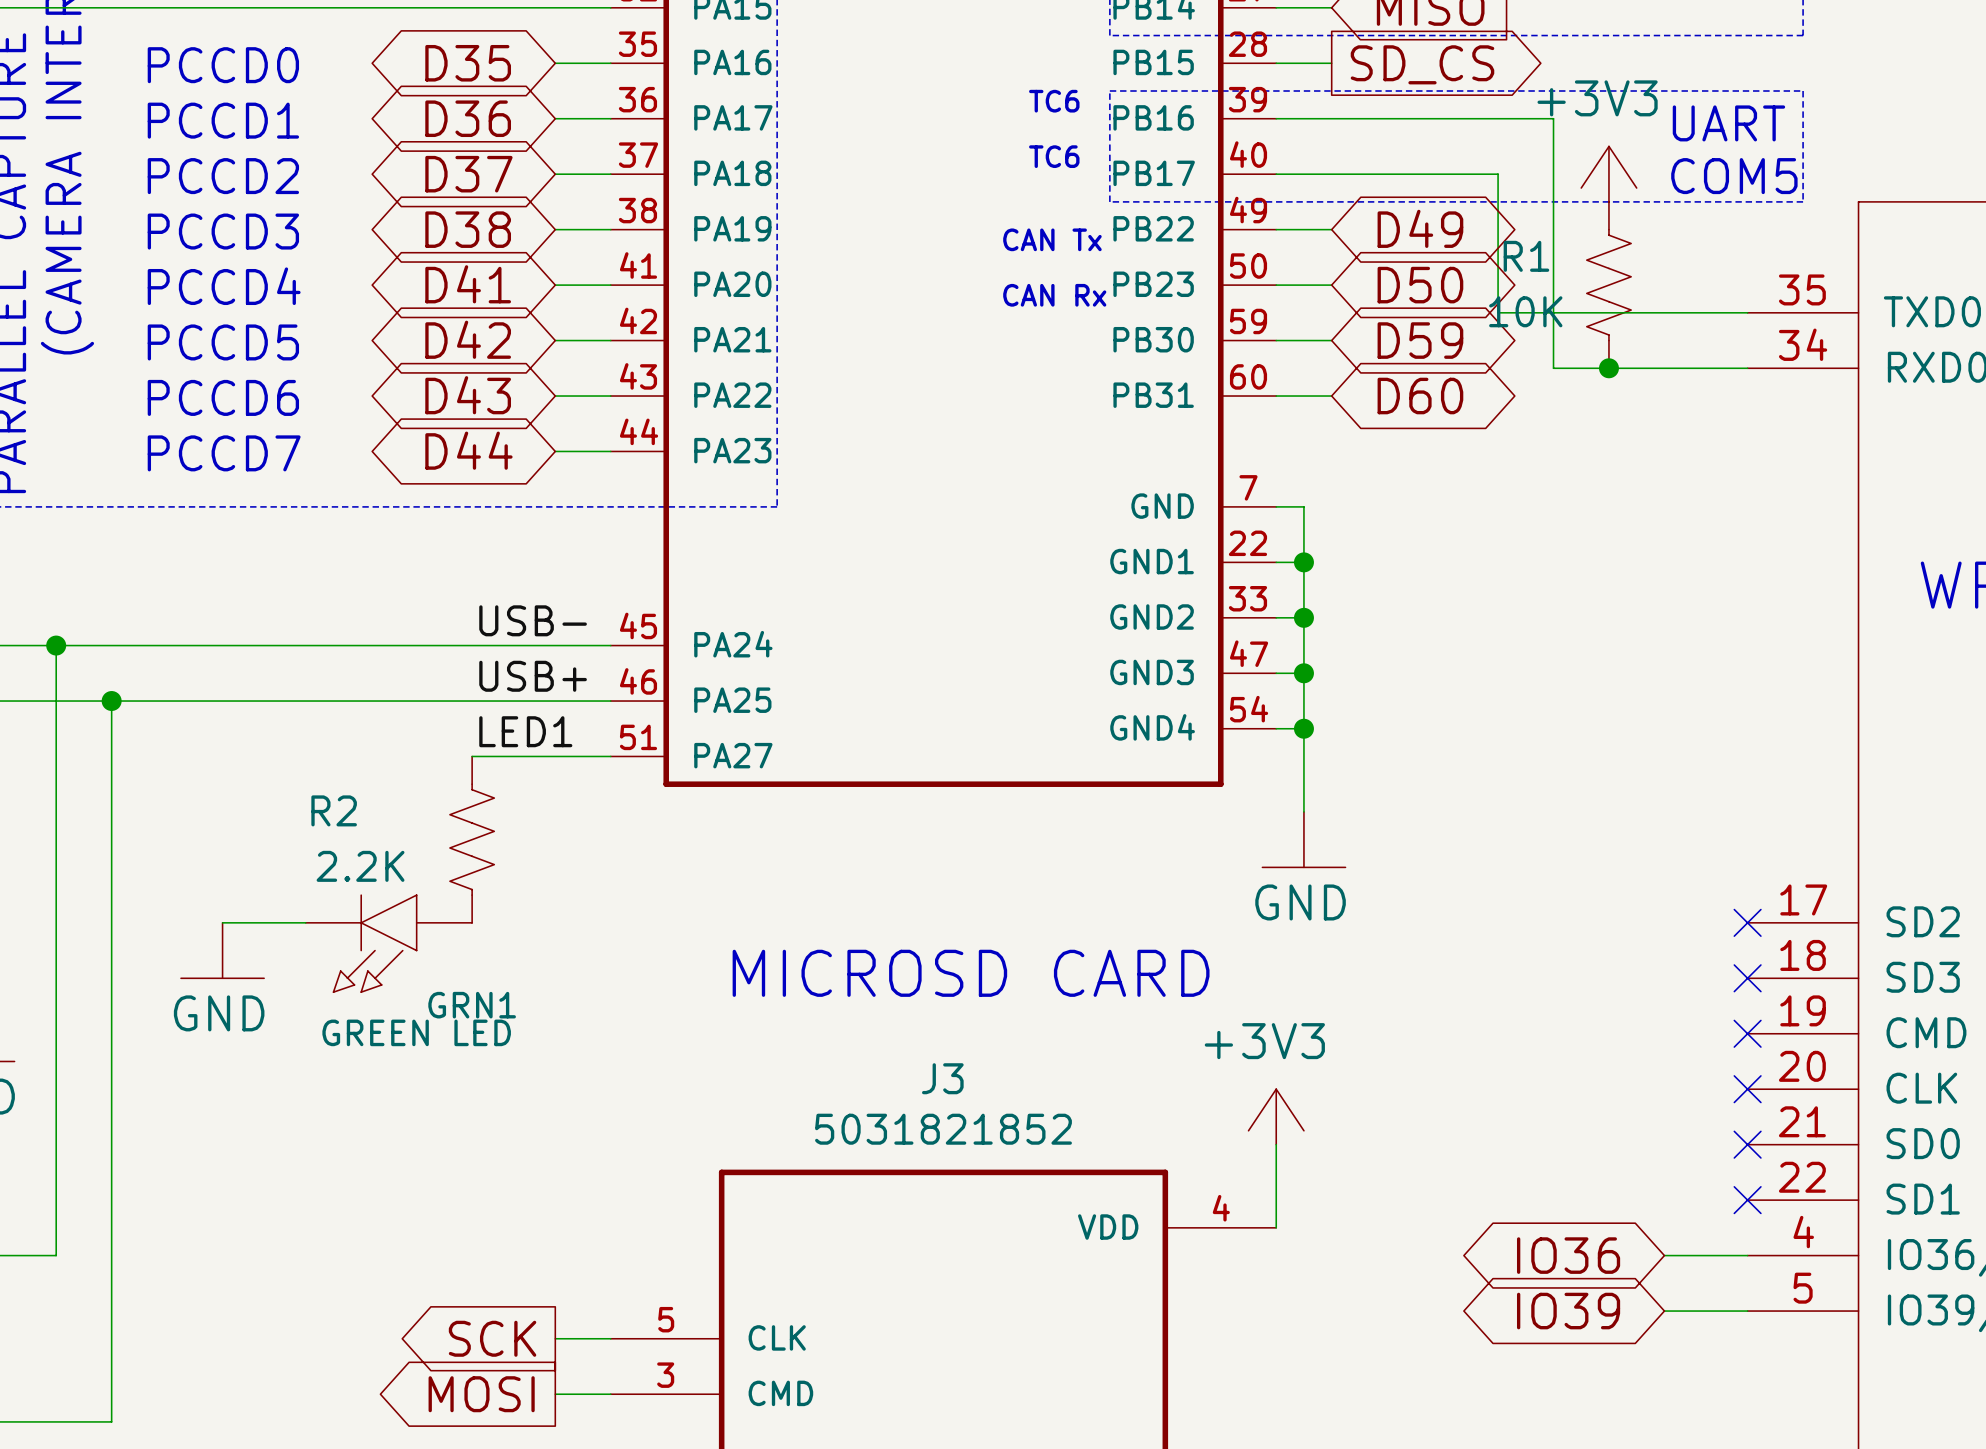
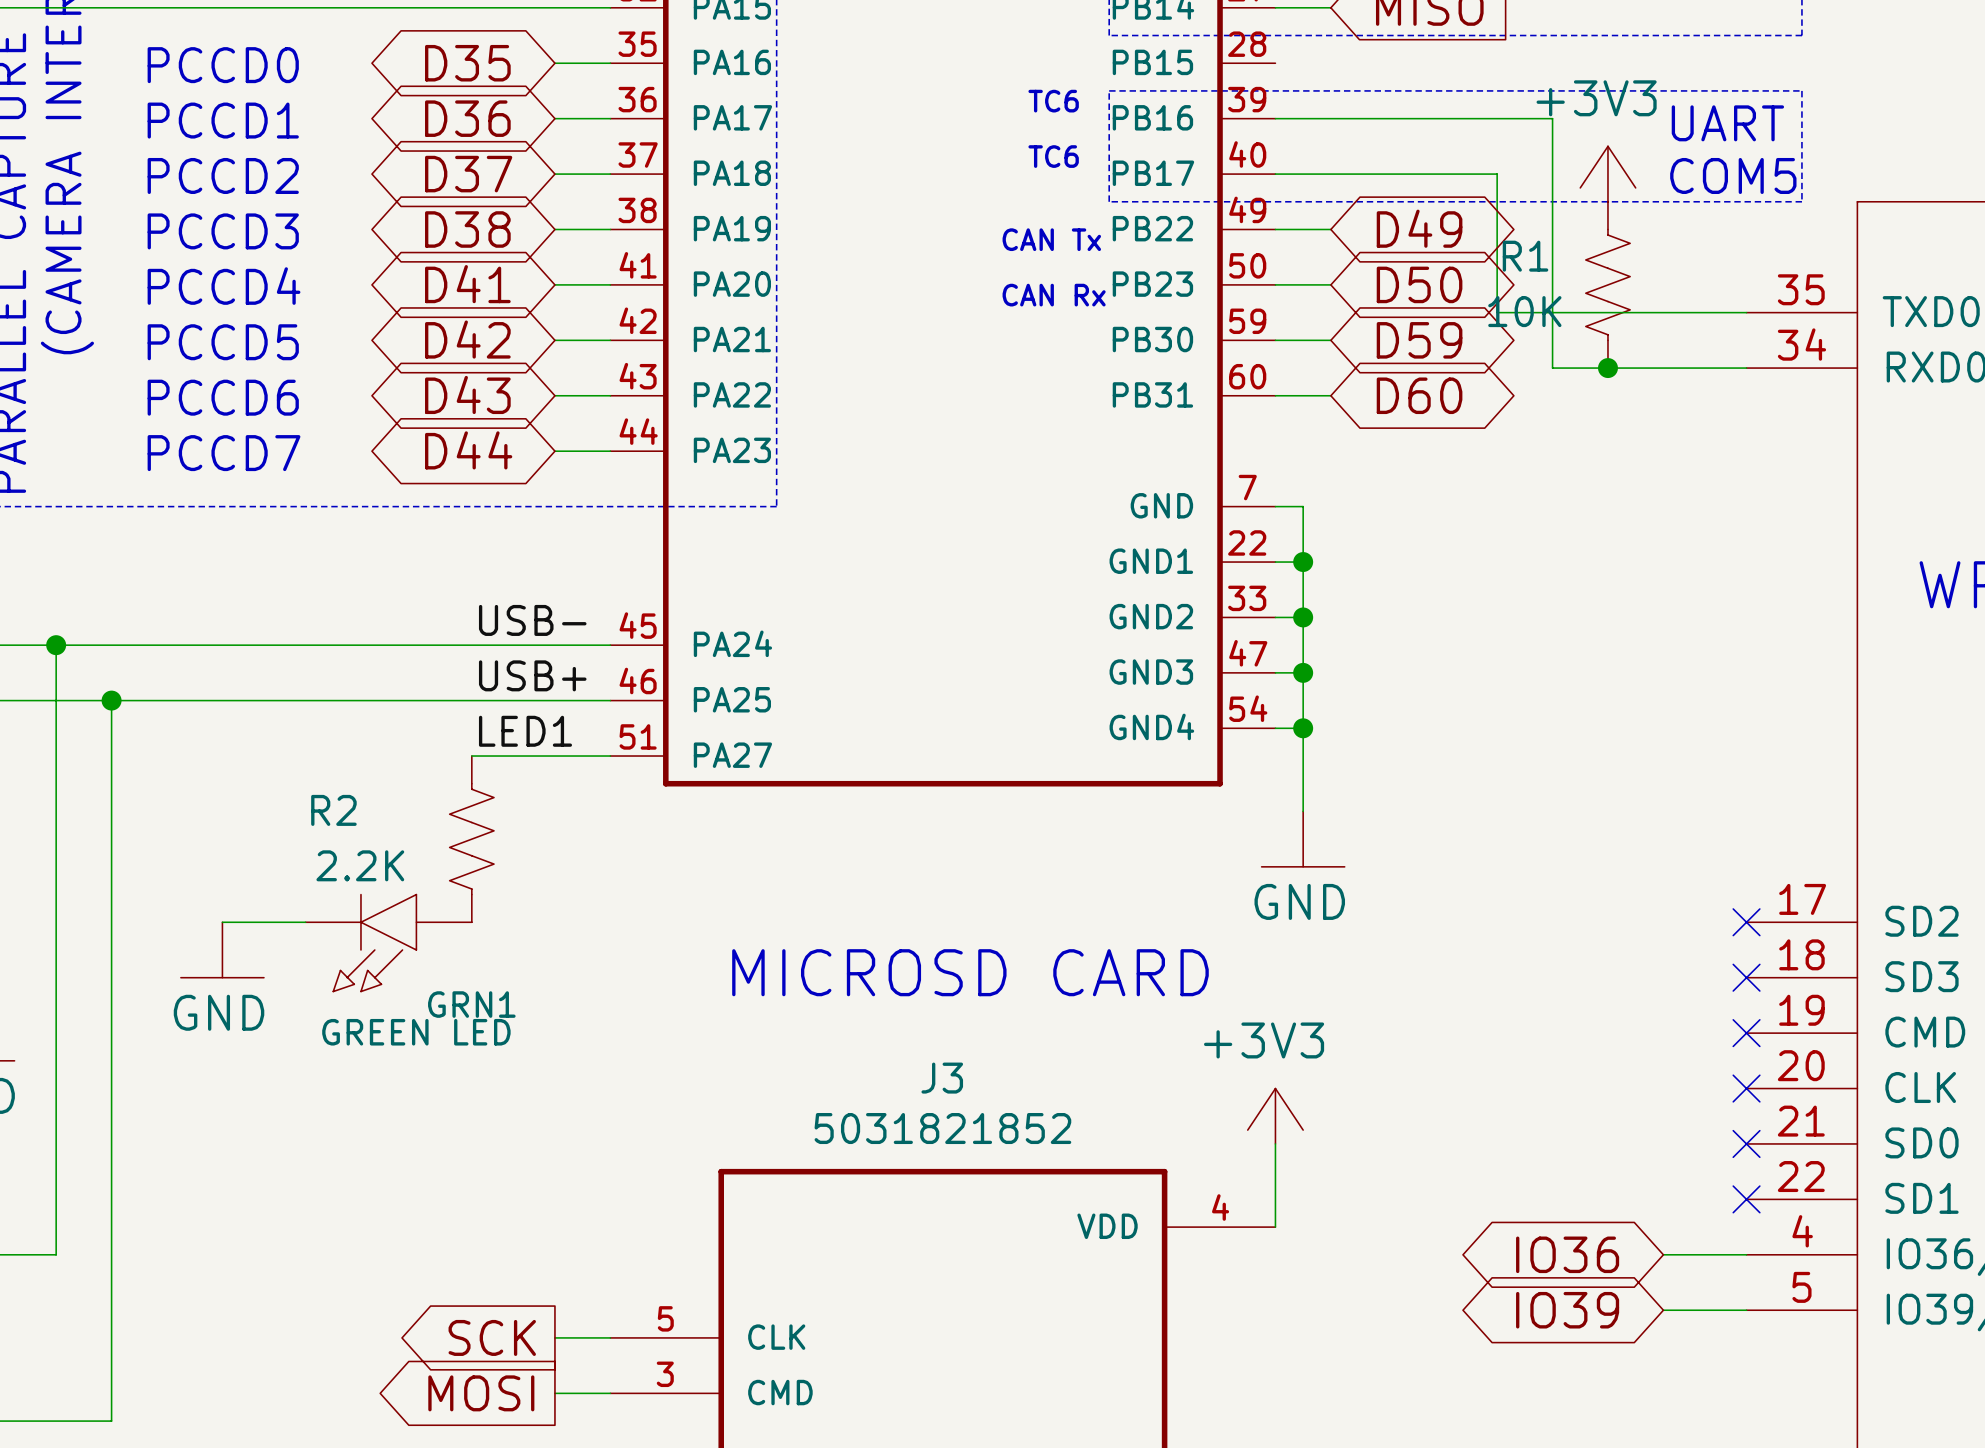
wire: (1276, 63) (1331, 63) -> none
global label: SD_CS (1422, 64) -> none

